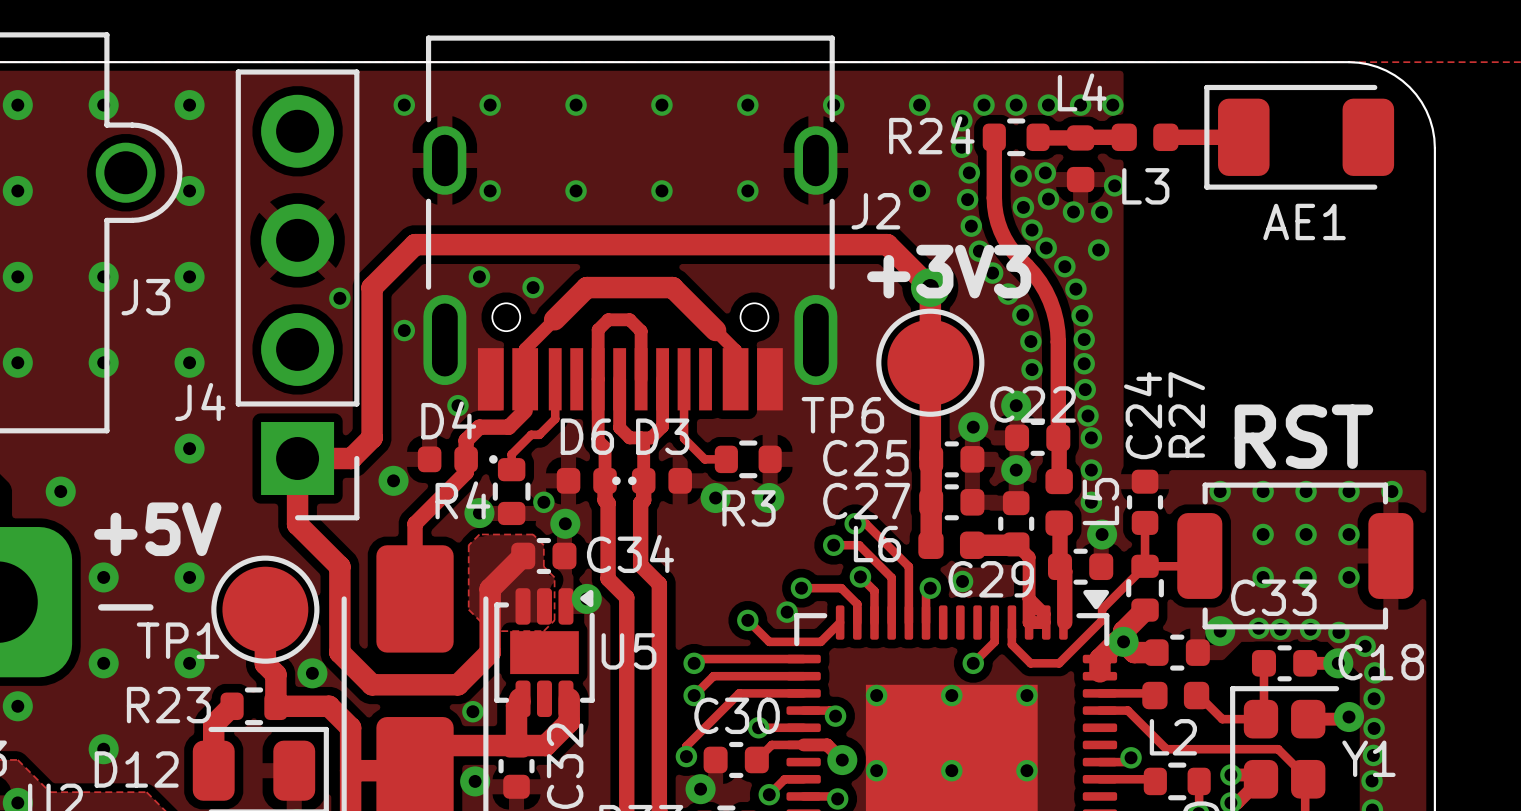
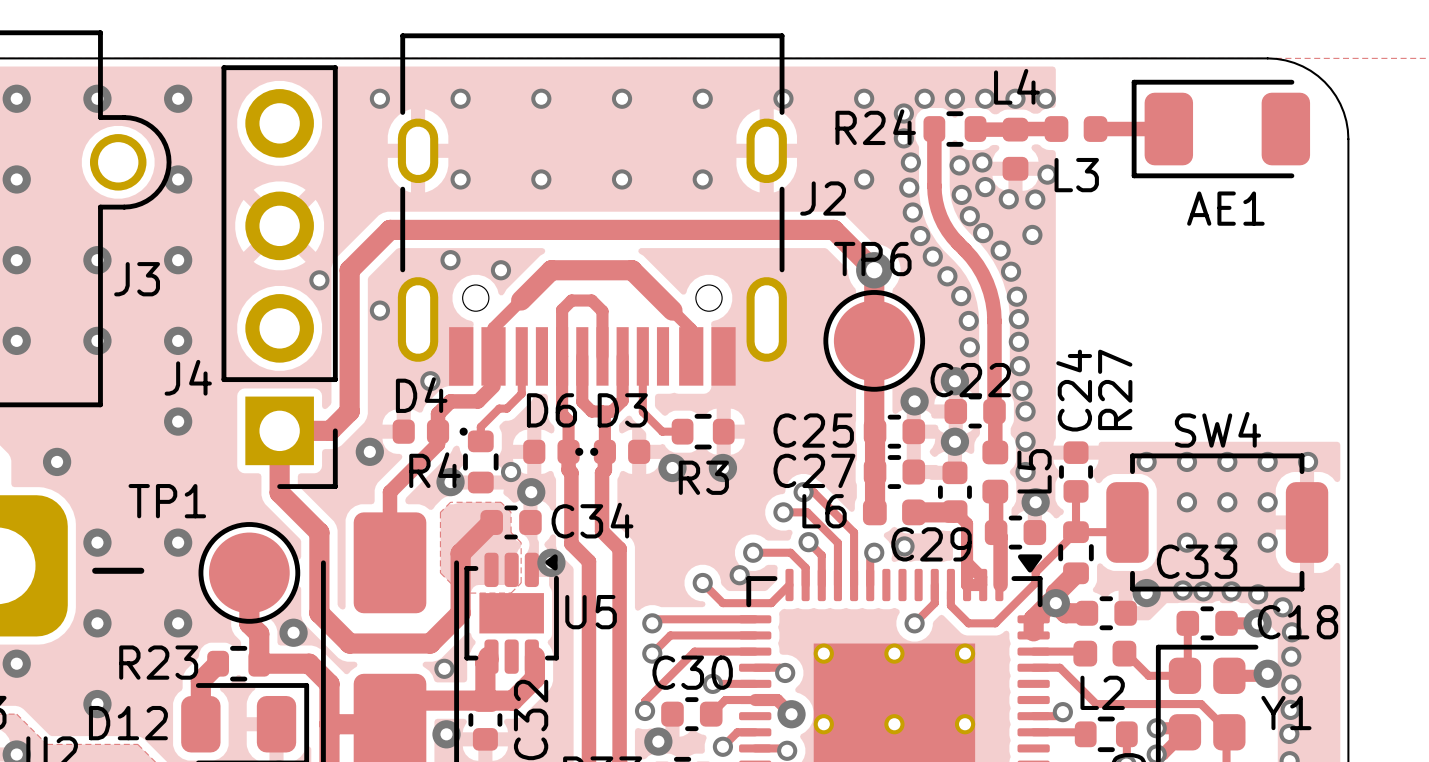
text: +3V3 (949, 271) -> none
TP6 name position: TP6 (842, 415) -> TP6 (872, 259)
text: RST (1303, 436) -> none
SW4 name: none -> SW4 (1217, 429)
text: +5V (157, 529) -> none
TP1 name position: TP1 (178, 640) -> TP1 (167, 501)

